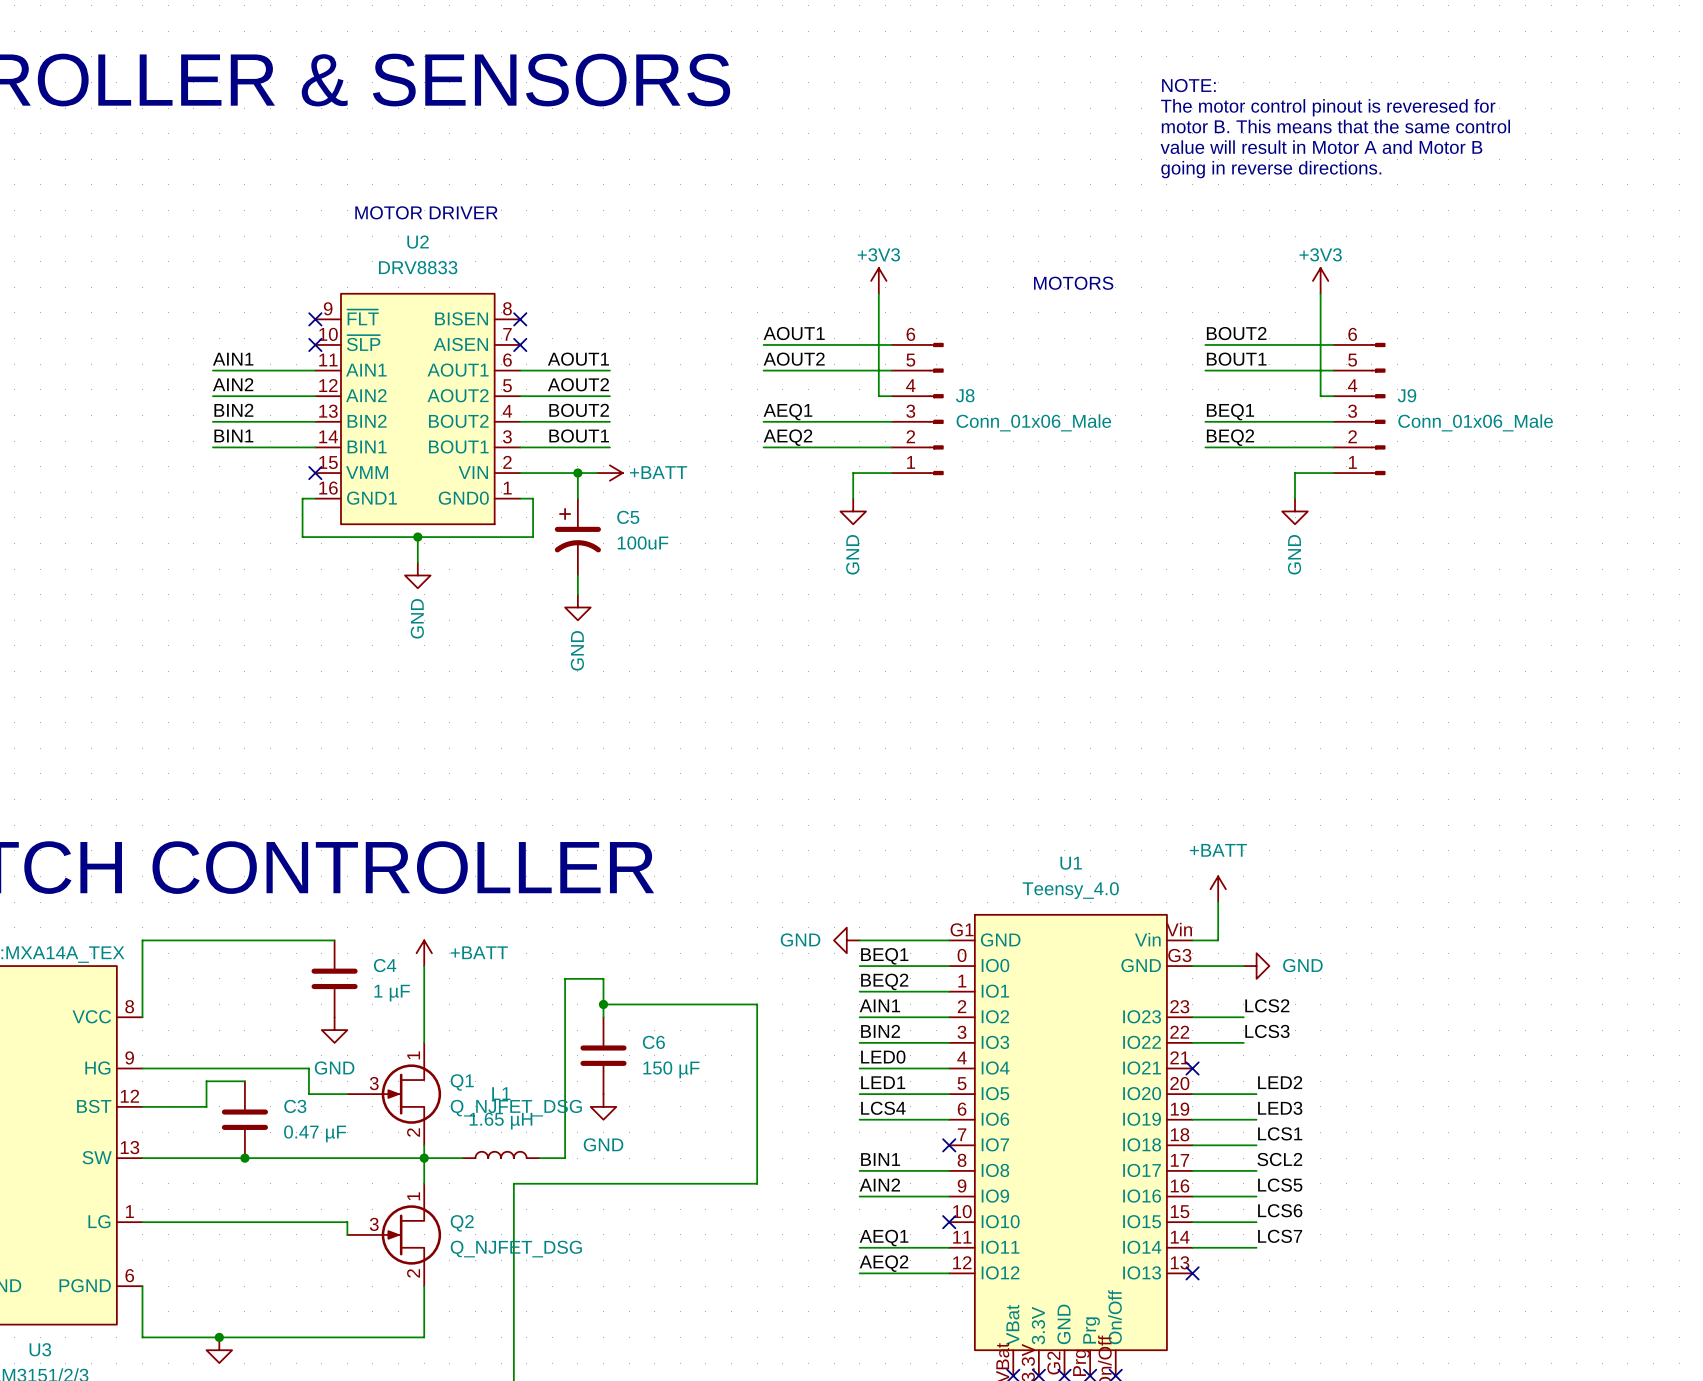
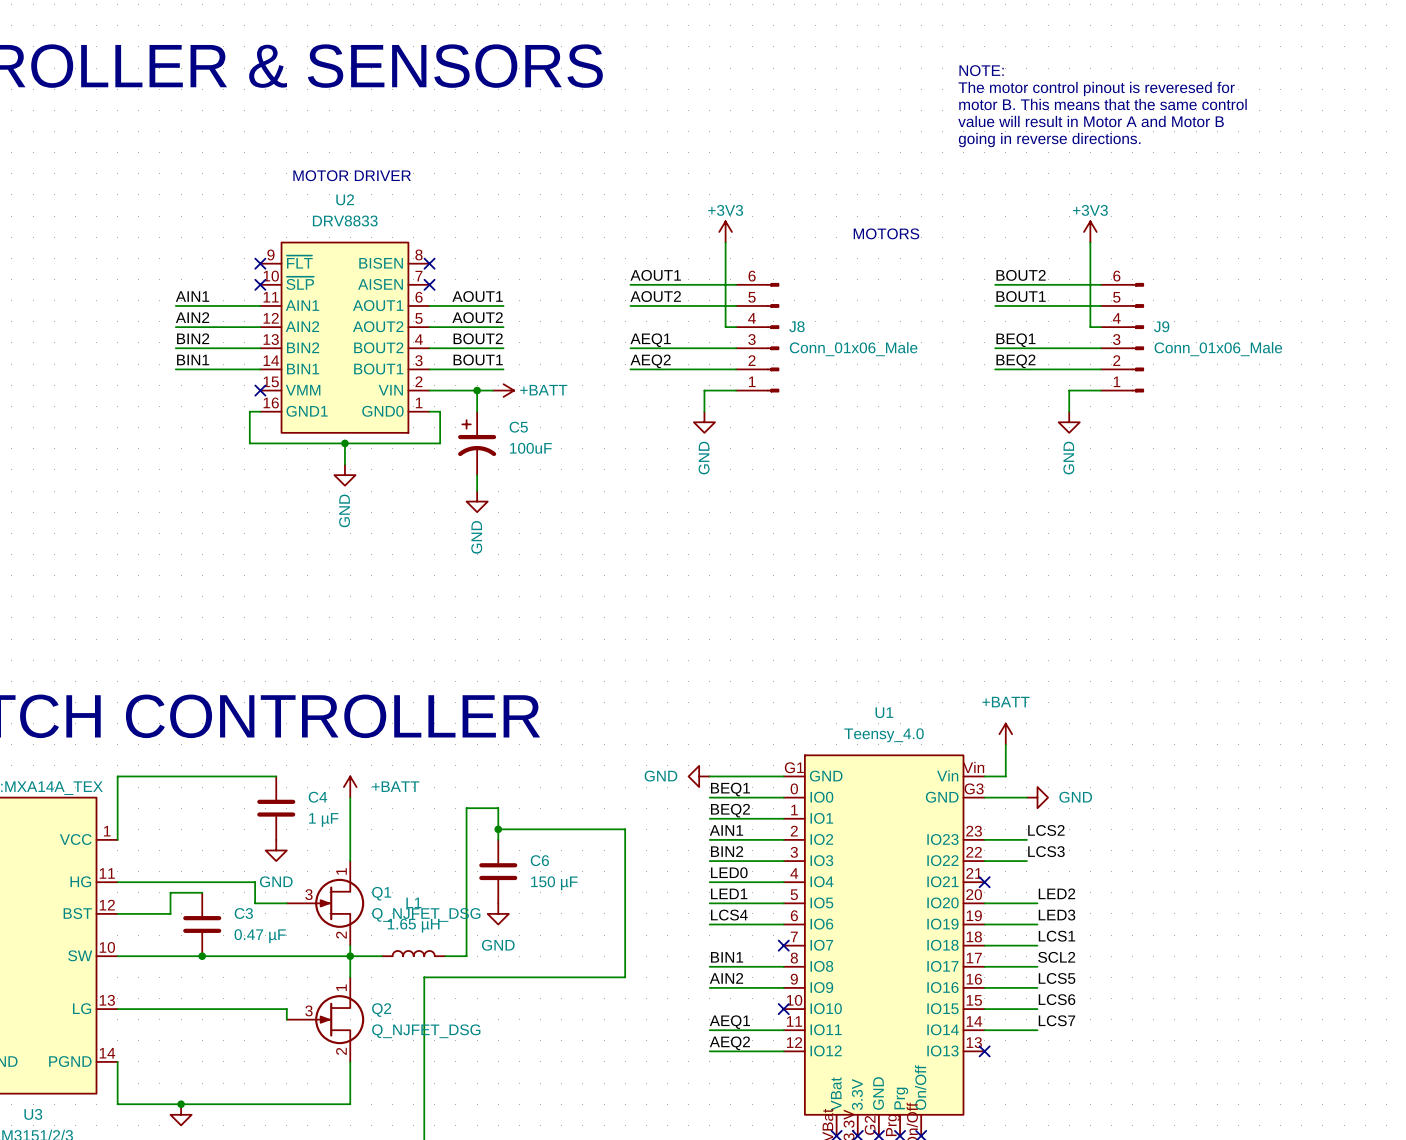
U3 pin number: 8 (129, 1006) -> 1 (107, 831)
U3 pin number: 9 (129, 1057) -> 11 (107, 873)
U3 pin number: 13 (129, 1147) -> 10 (107, 947)
U3 pin number: 1 (129, 1211) -> 13 (107, 1000)
U3 pin number: 6 (129, 1275) -> 14 (107, 1053)

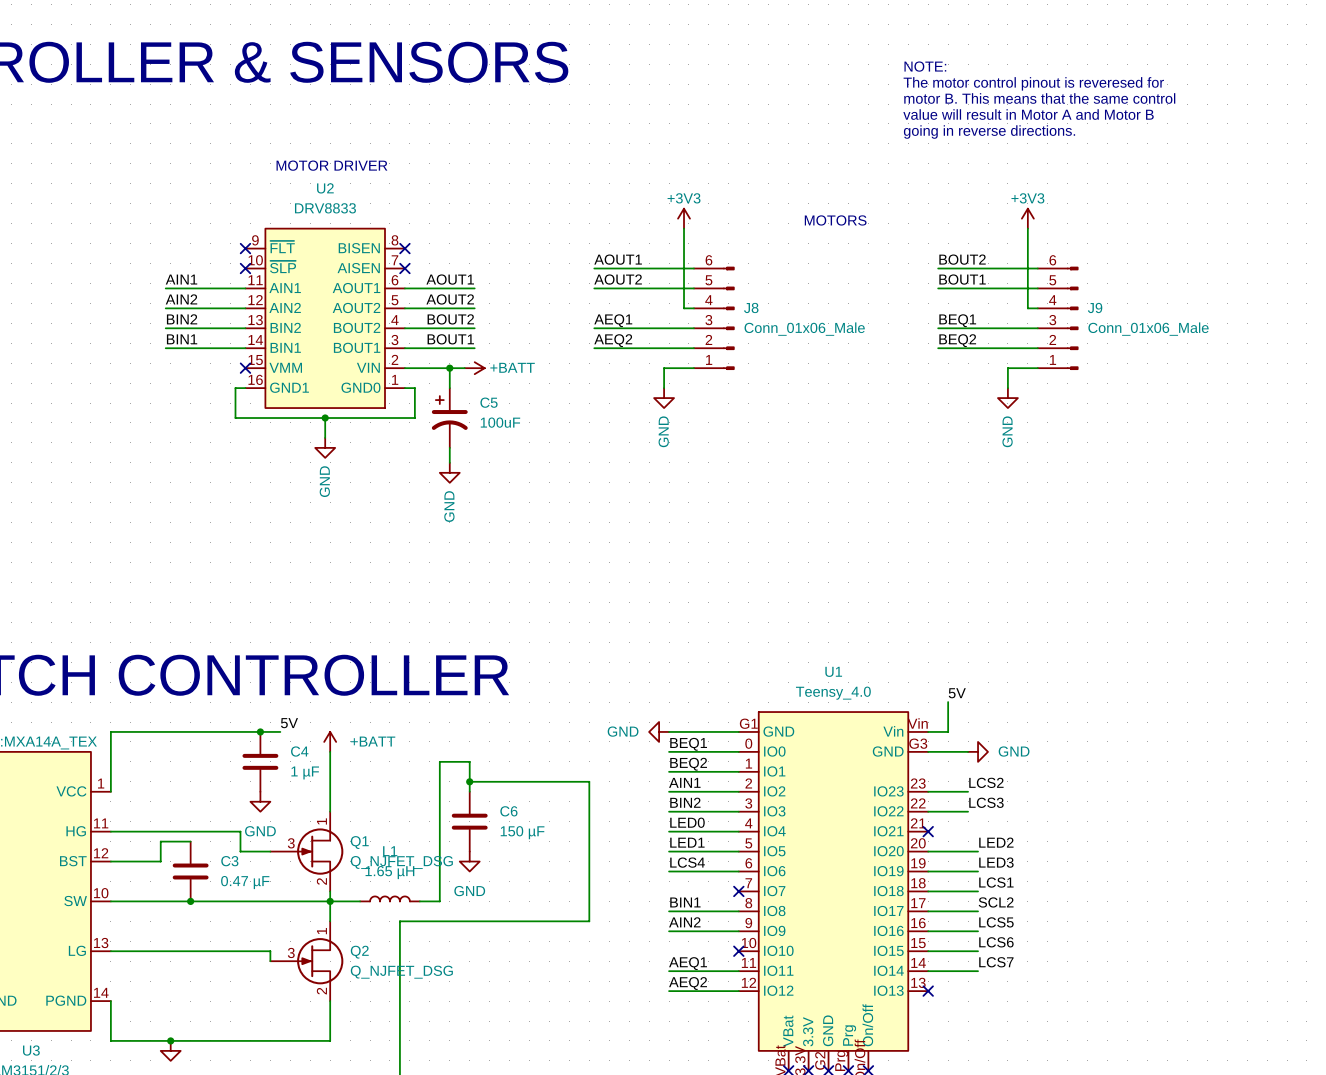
power symbol: +BATT (1005, 734) -> none
label: none -> 5V (957, 693)
label: none -> 5V (289, 723)
wire: none -> (260, 731) (280, 731)
junction: none -> (260, 731)

